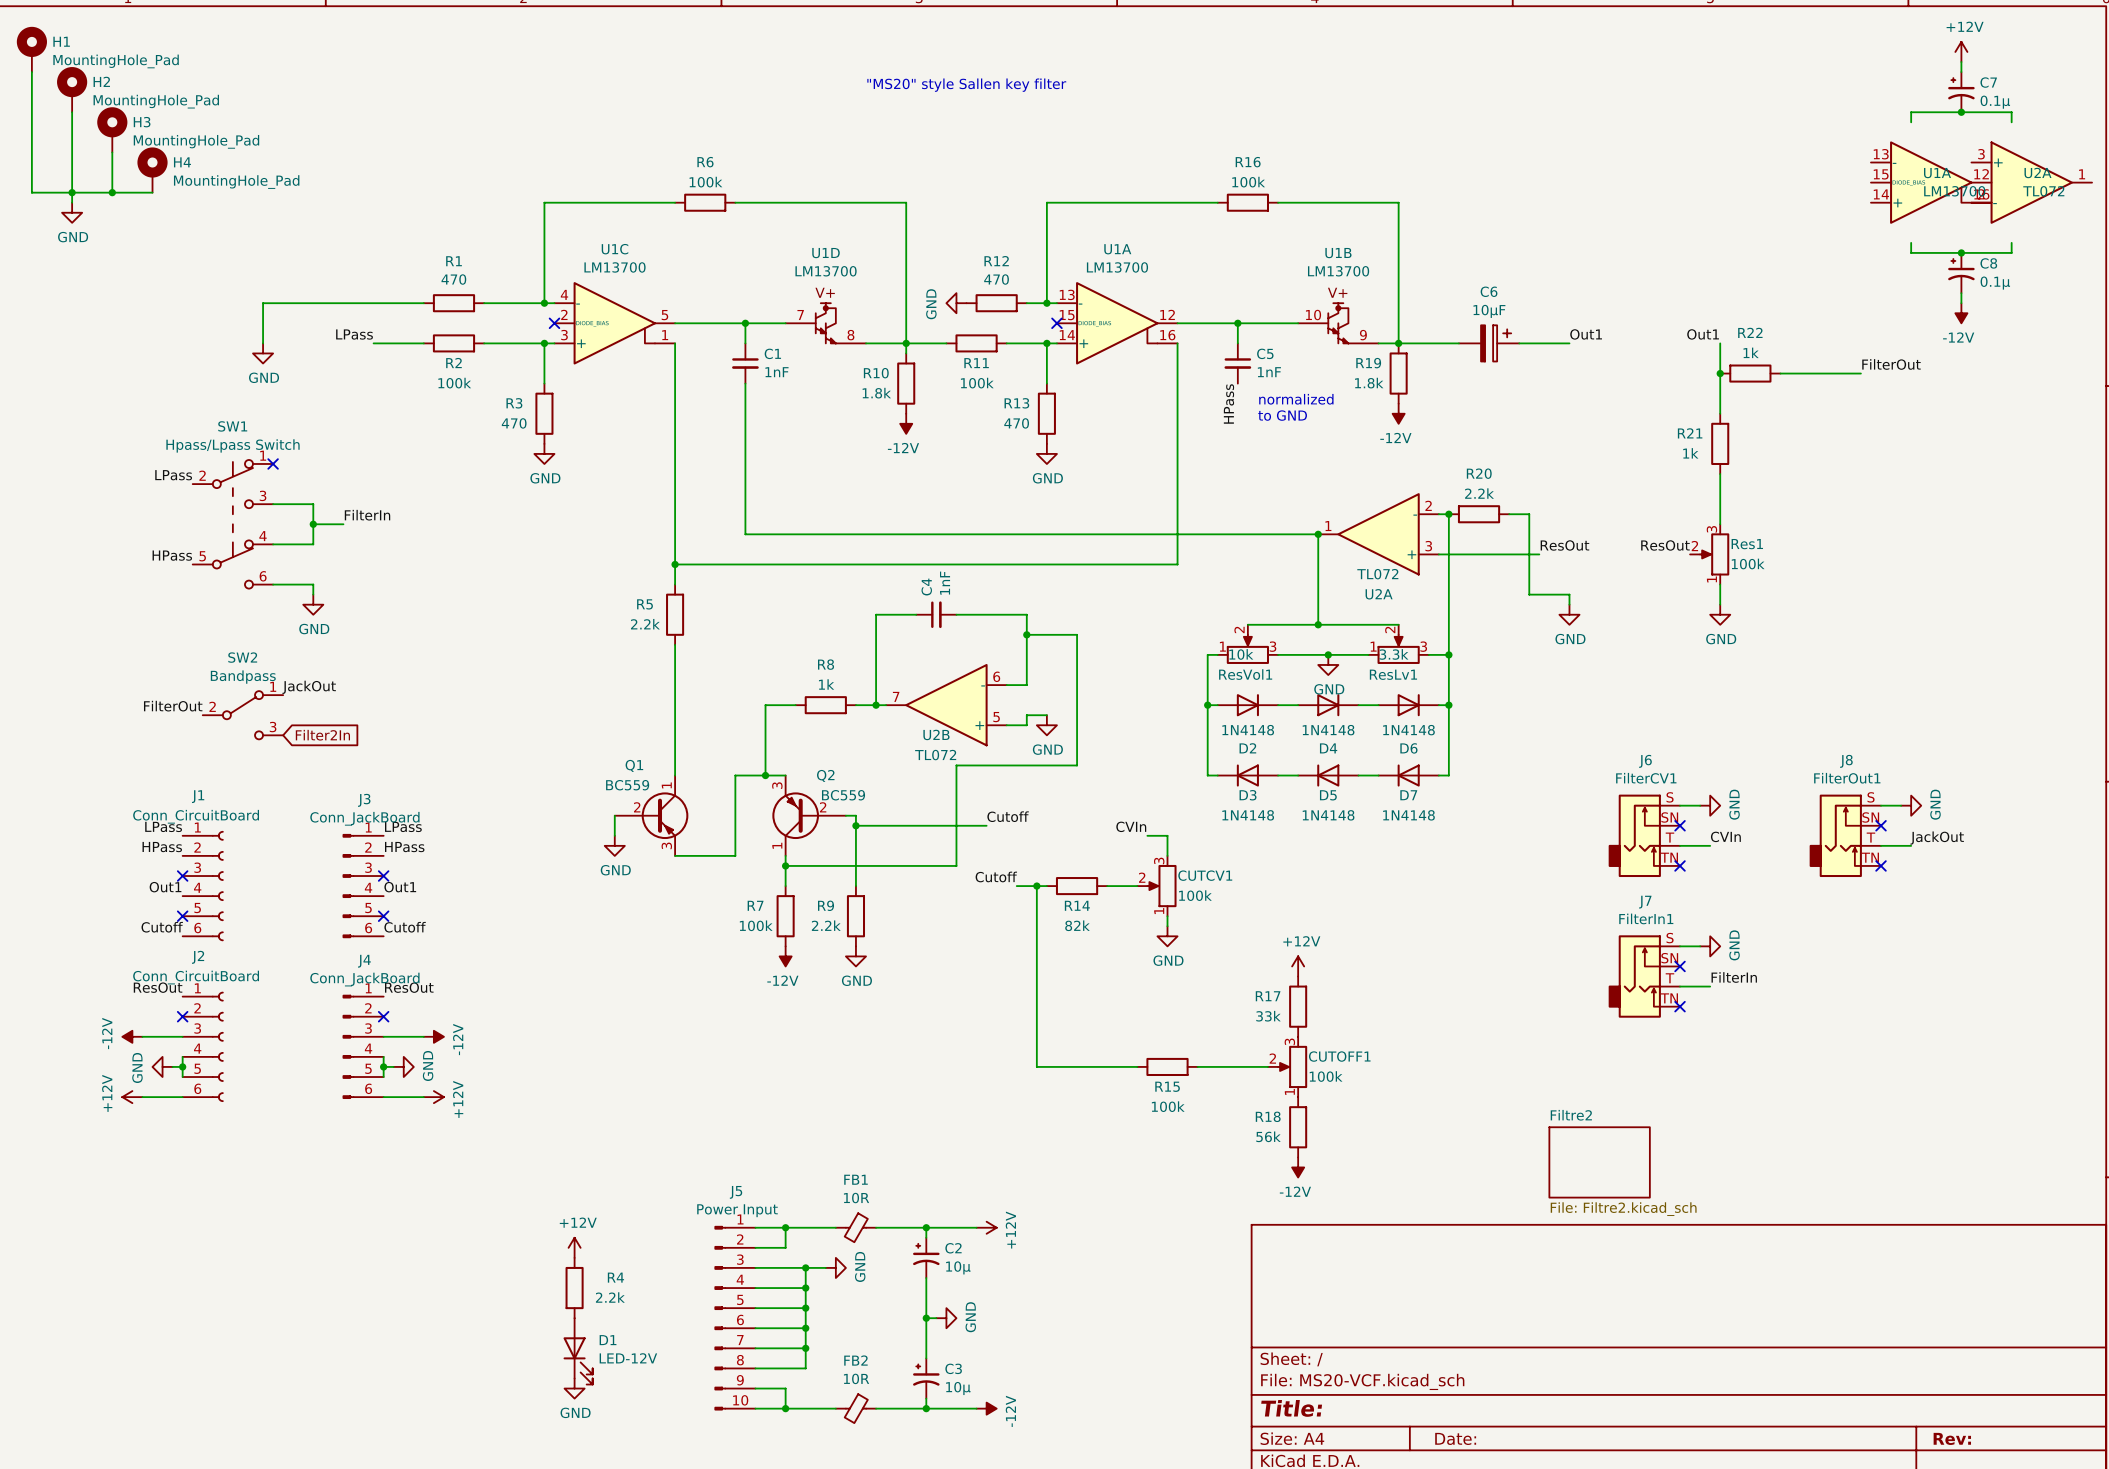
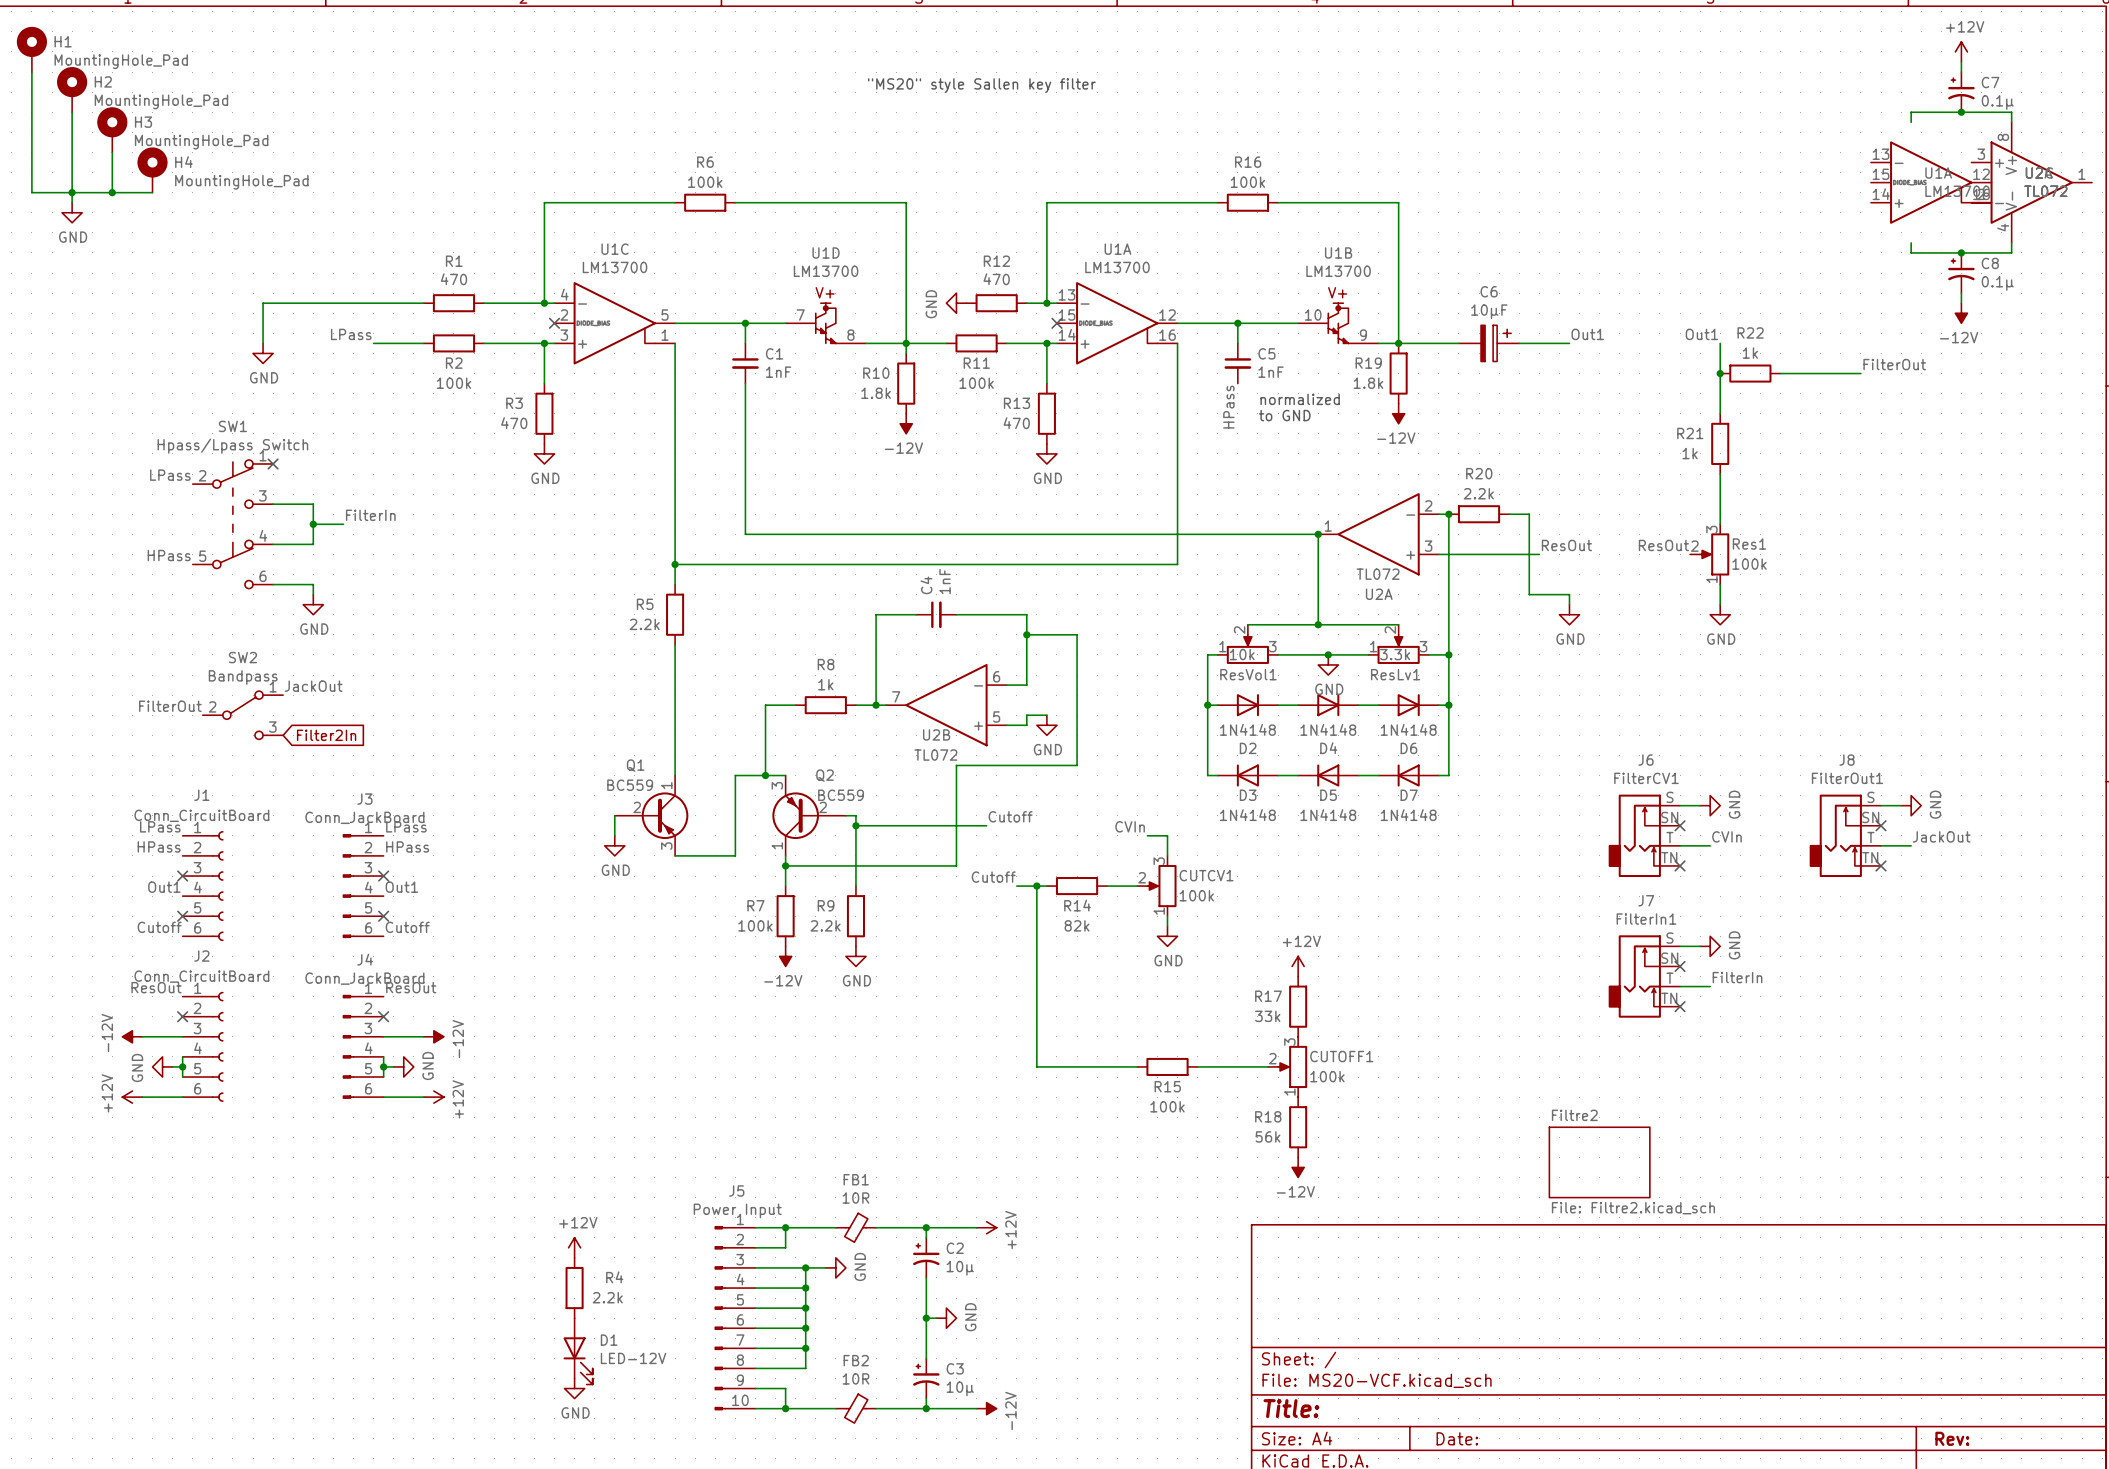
part: none -> TL072 (2011, 182)

